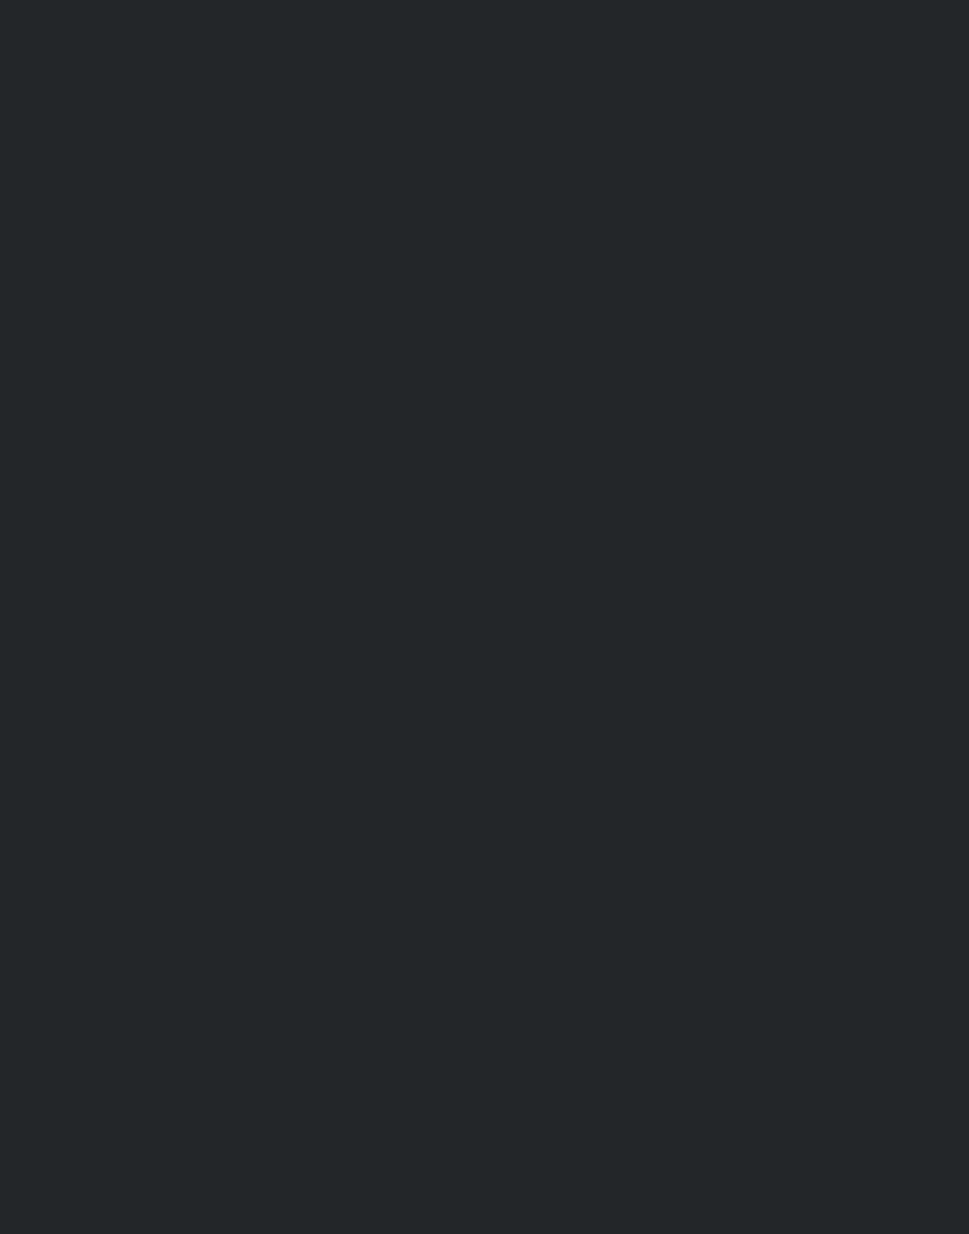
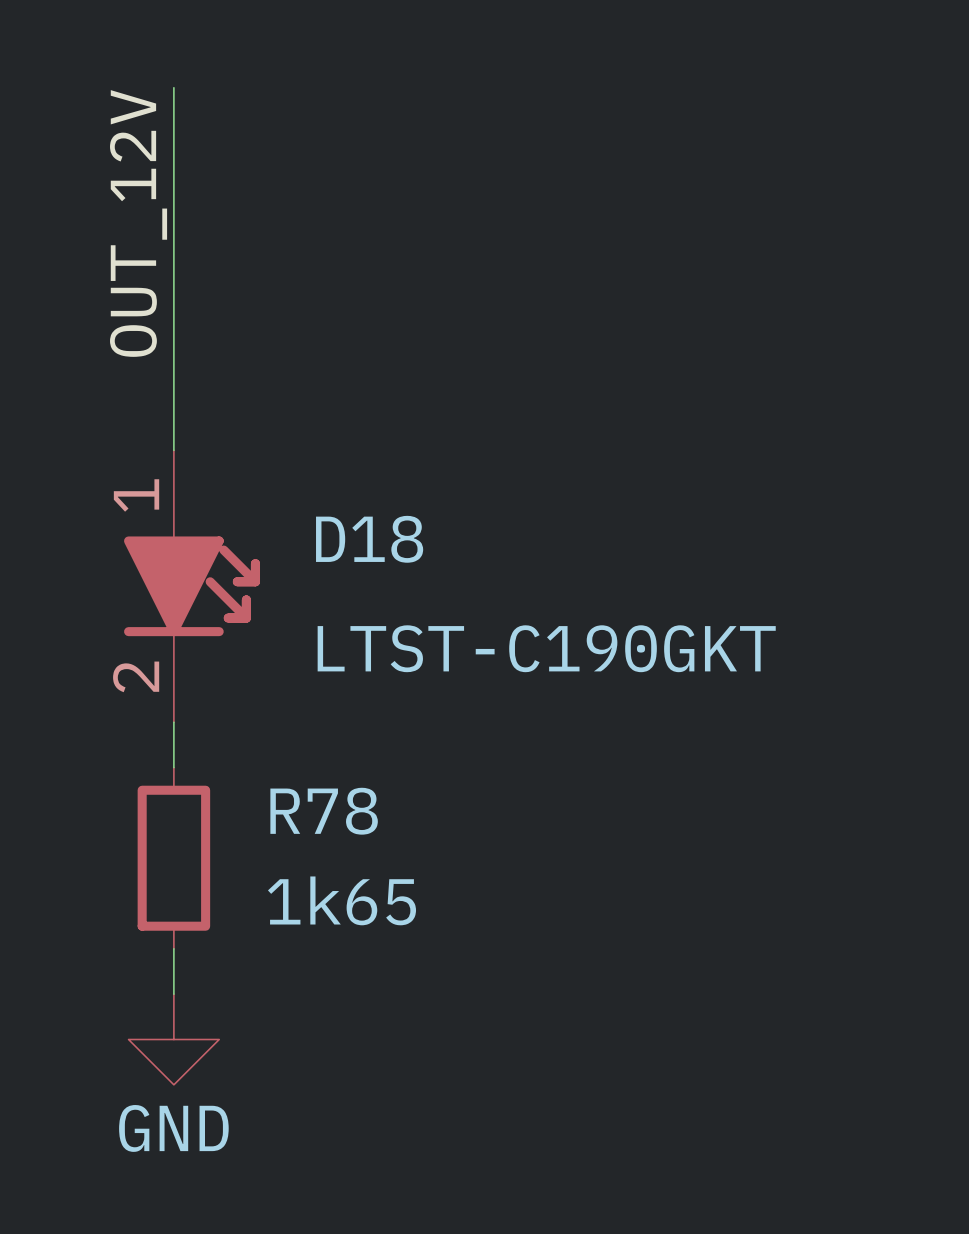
wire: none -> (173, 87) (173, 450)
label: none -> OUT_12V (138, 223)
D18: none -> (192, 586)
wire: none -> (173, 722) (173, 767)
R78: none -> (173, 858)
wire: none -> (173, 948) (173, 994)
power symbol: none -> GND (173, 1039)

